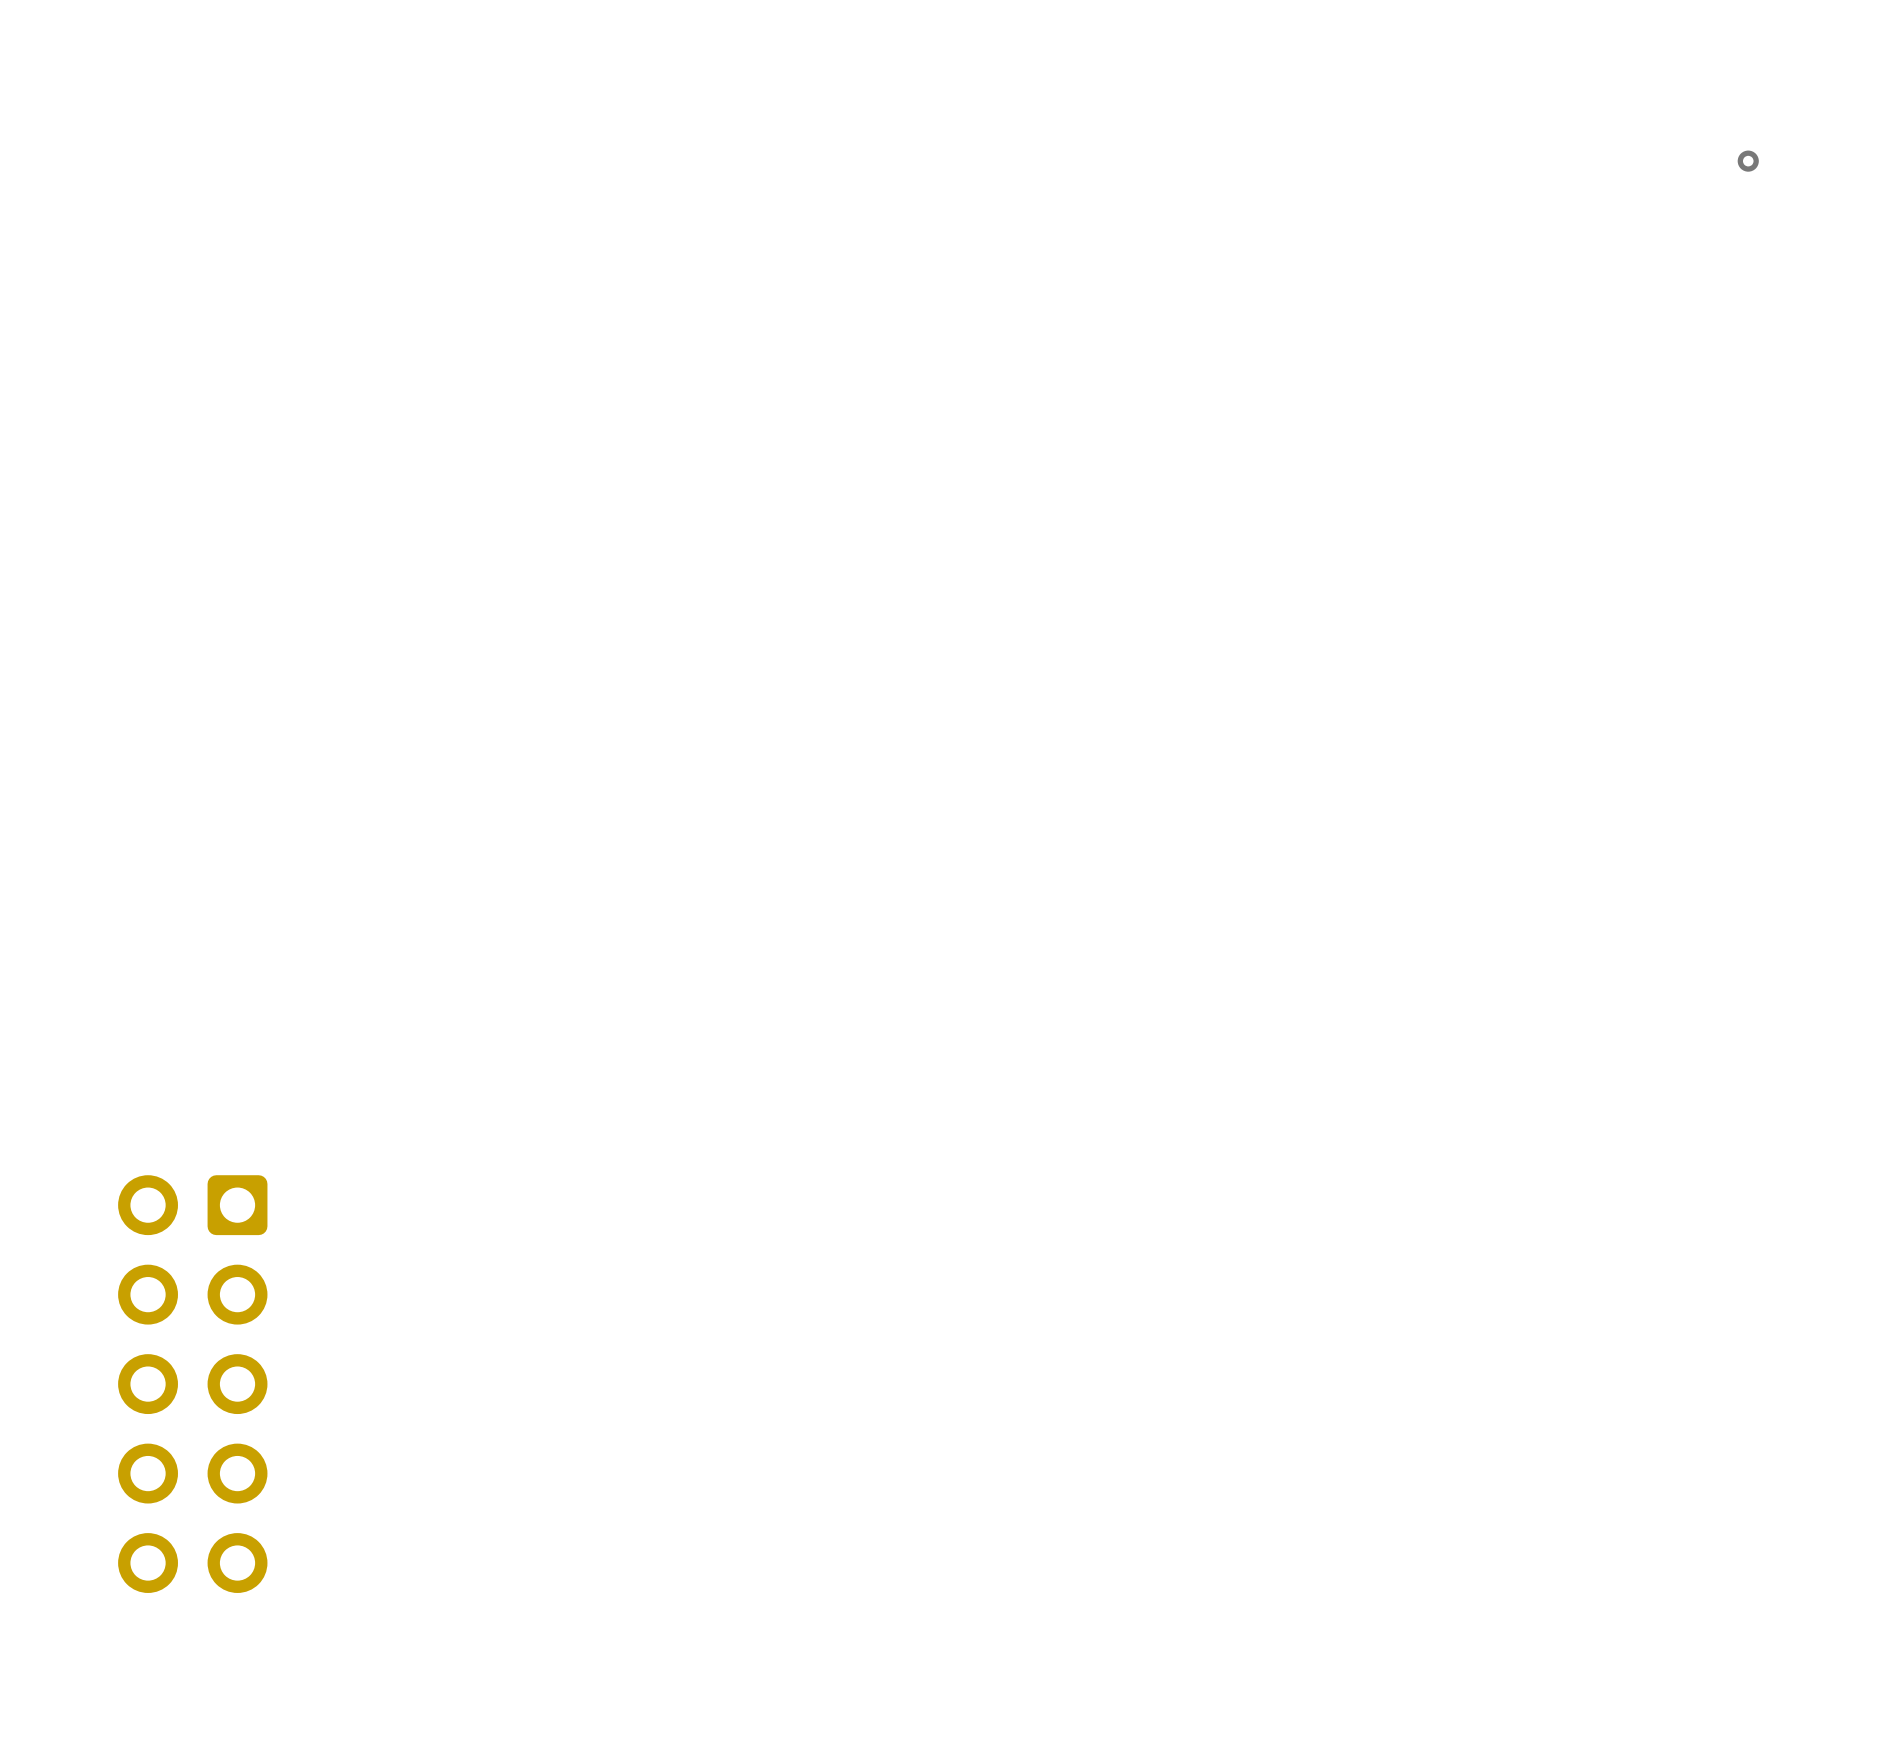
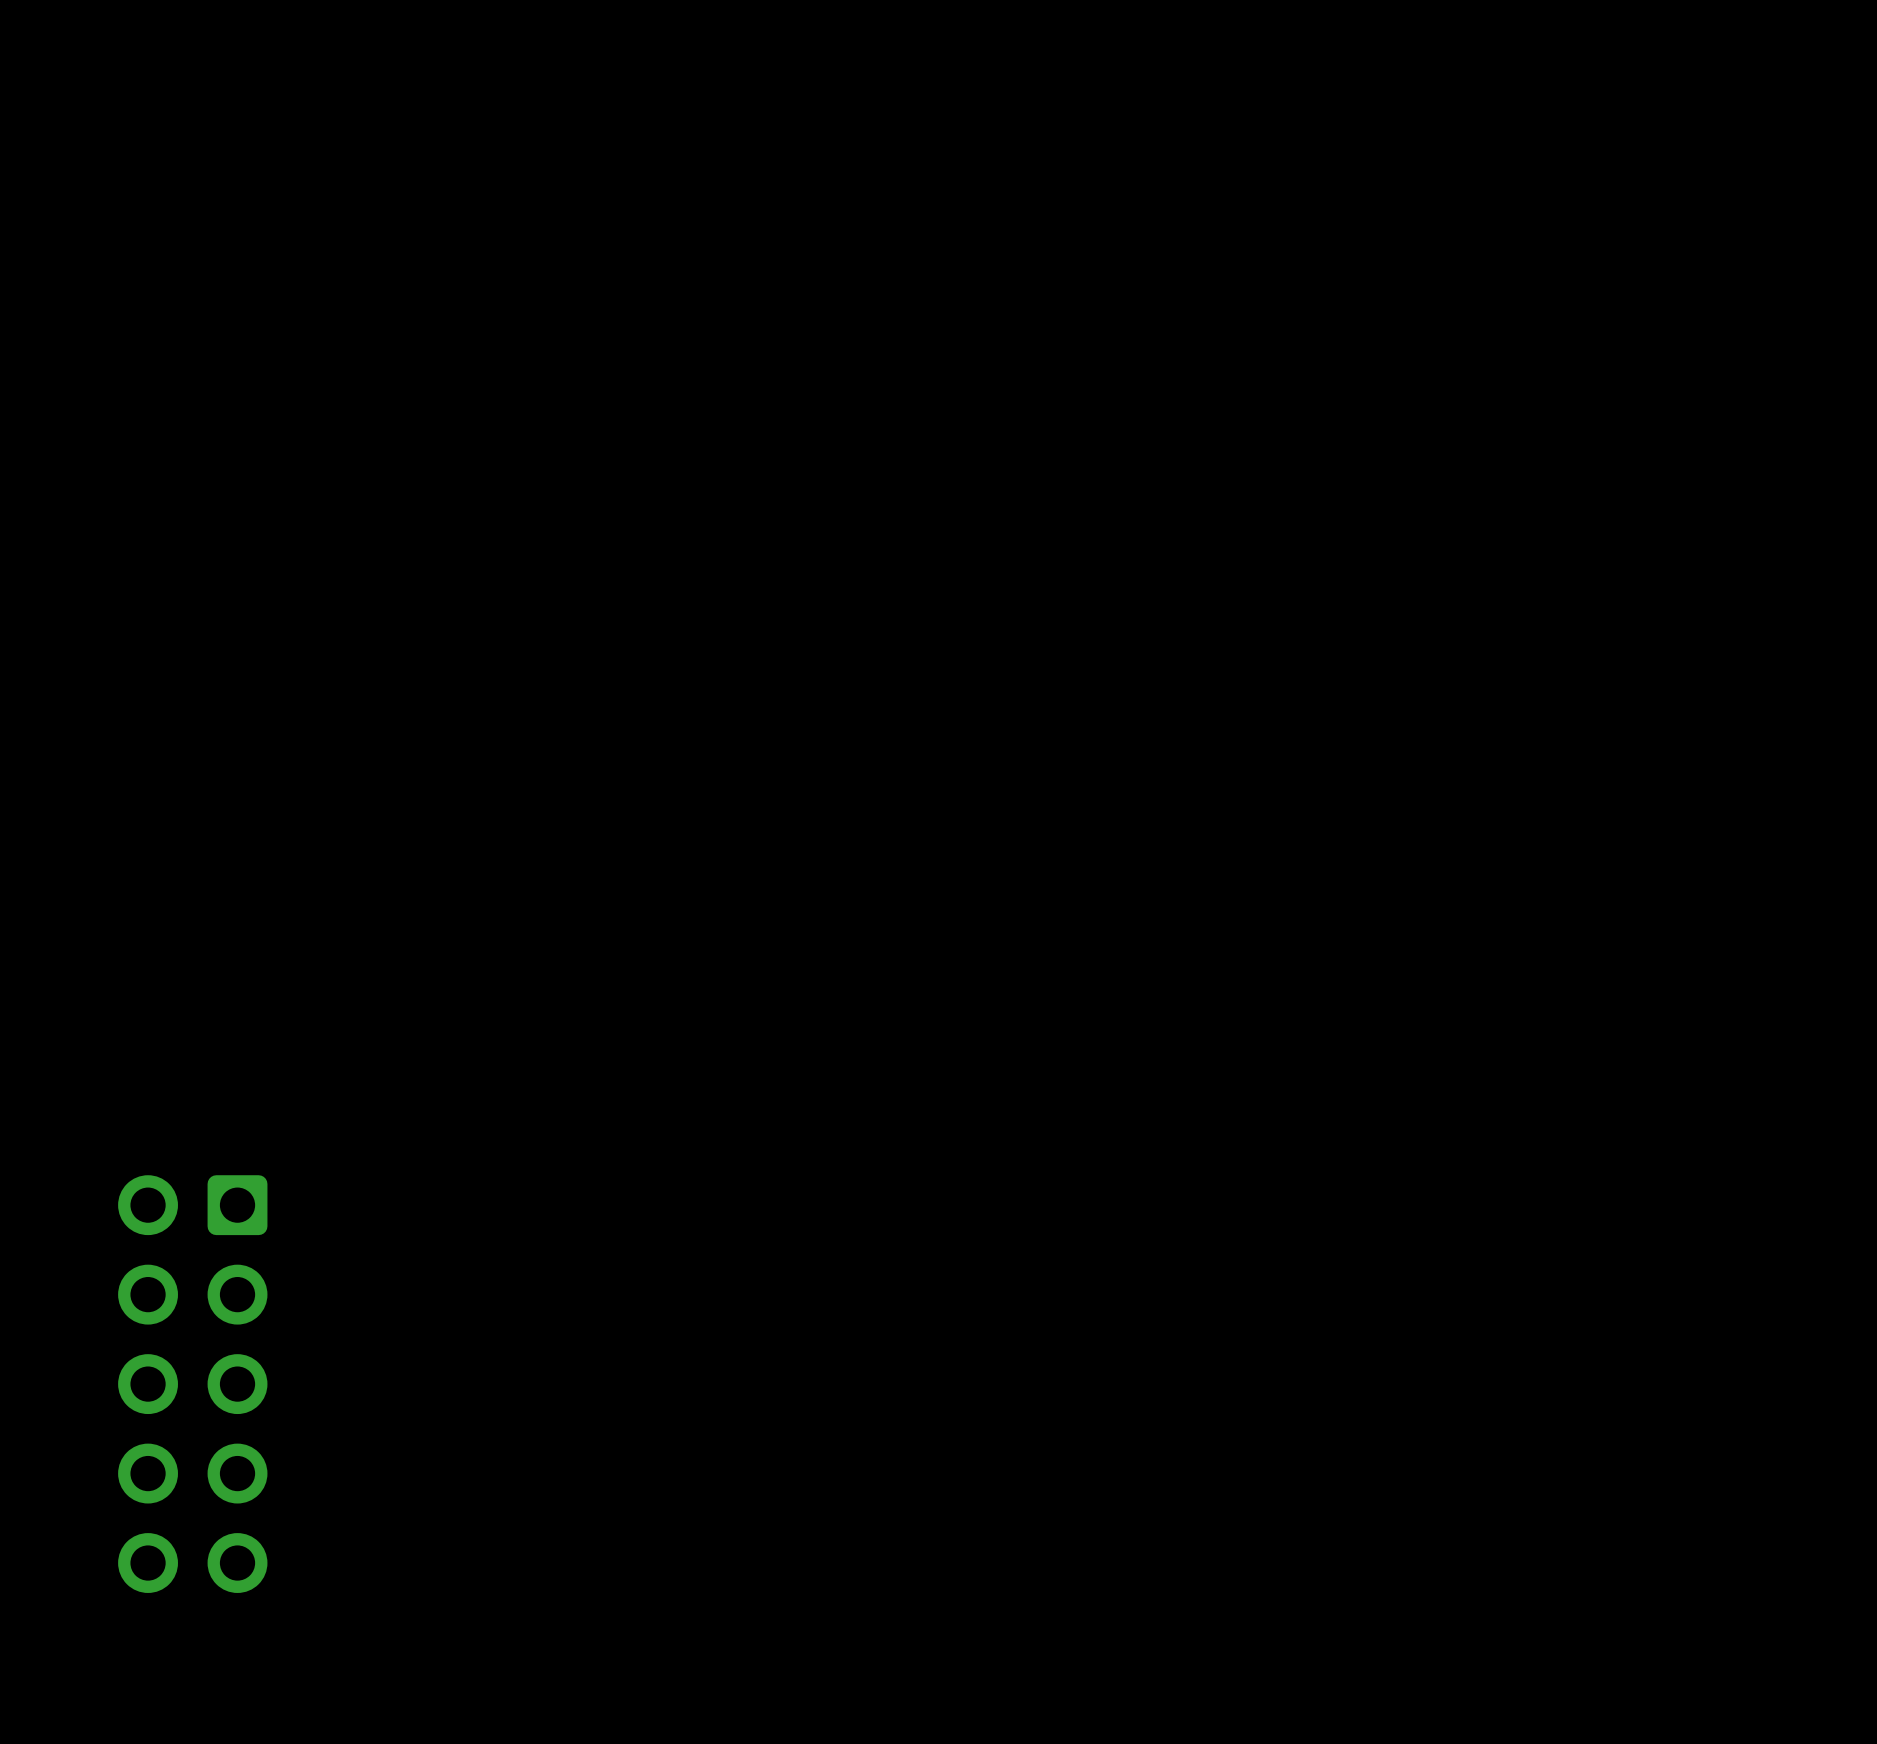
via: (1748, 161) -> none

